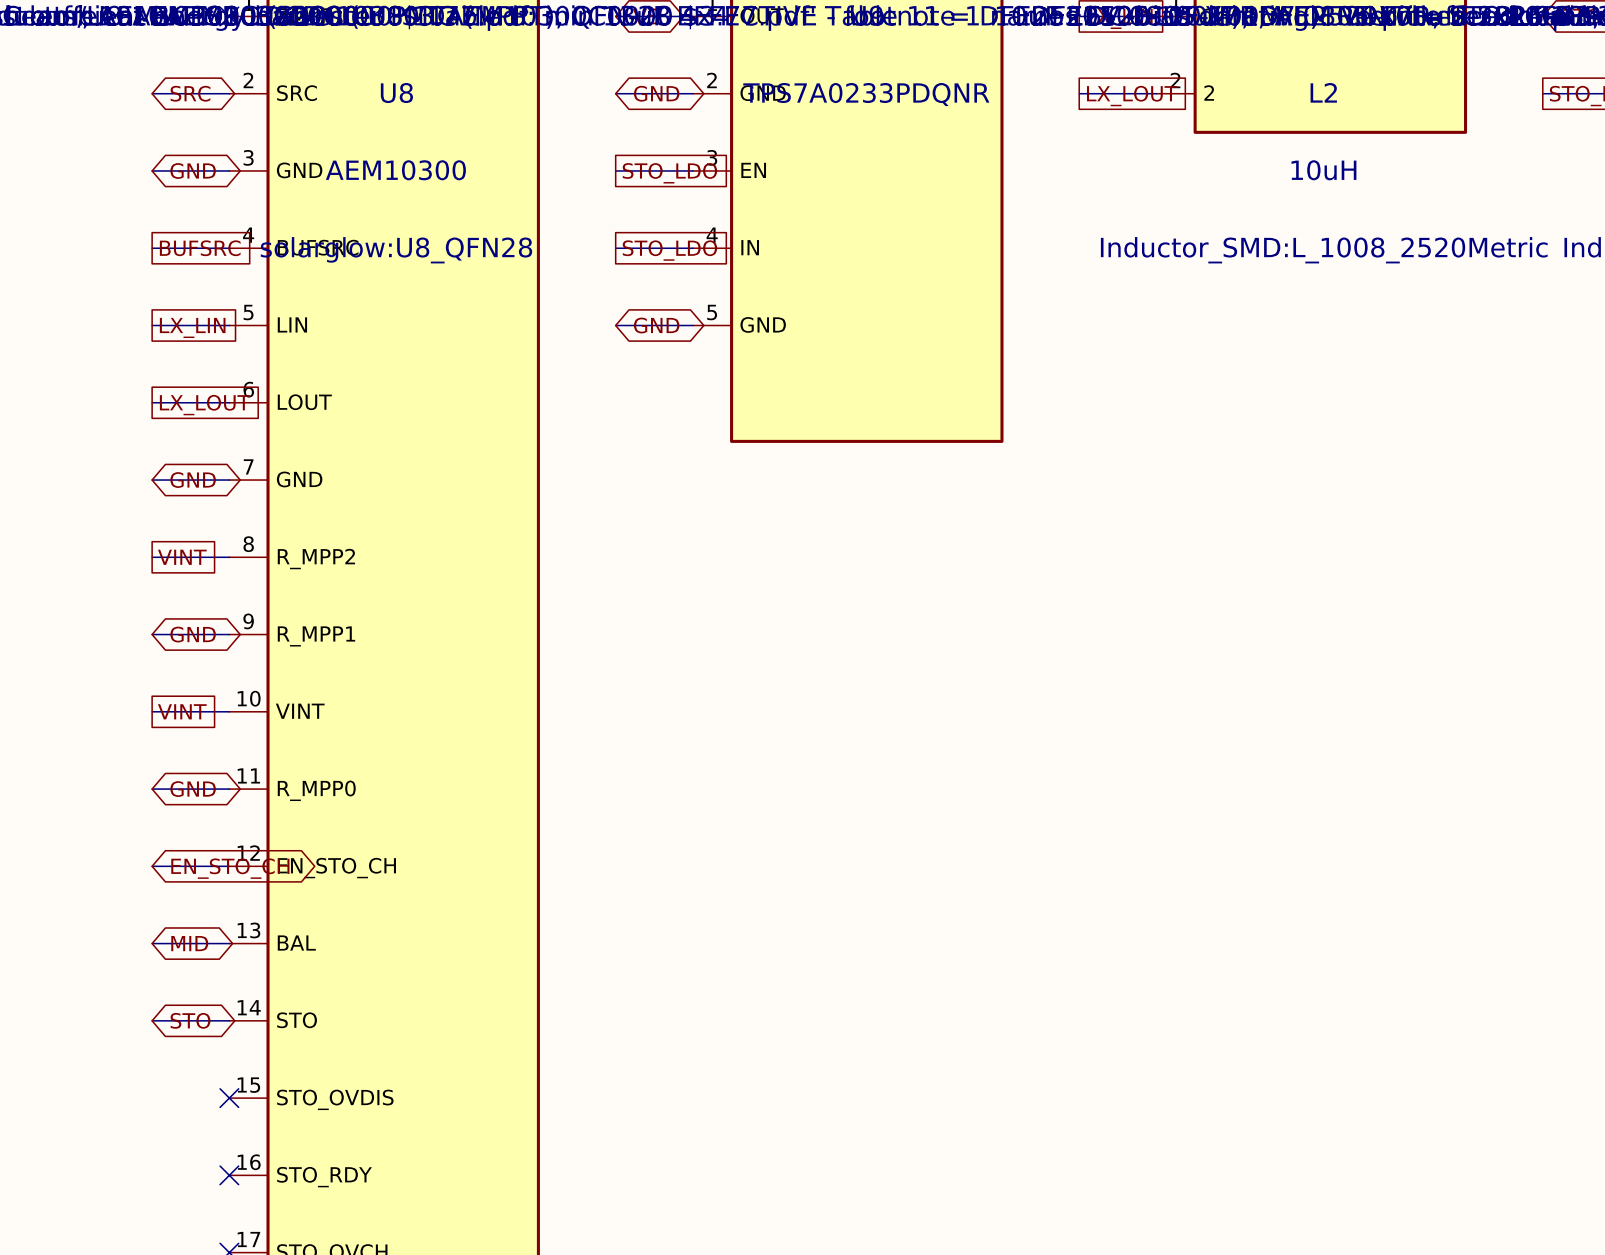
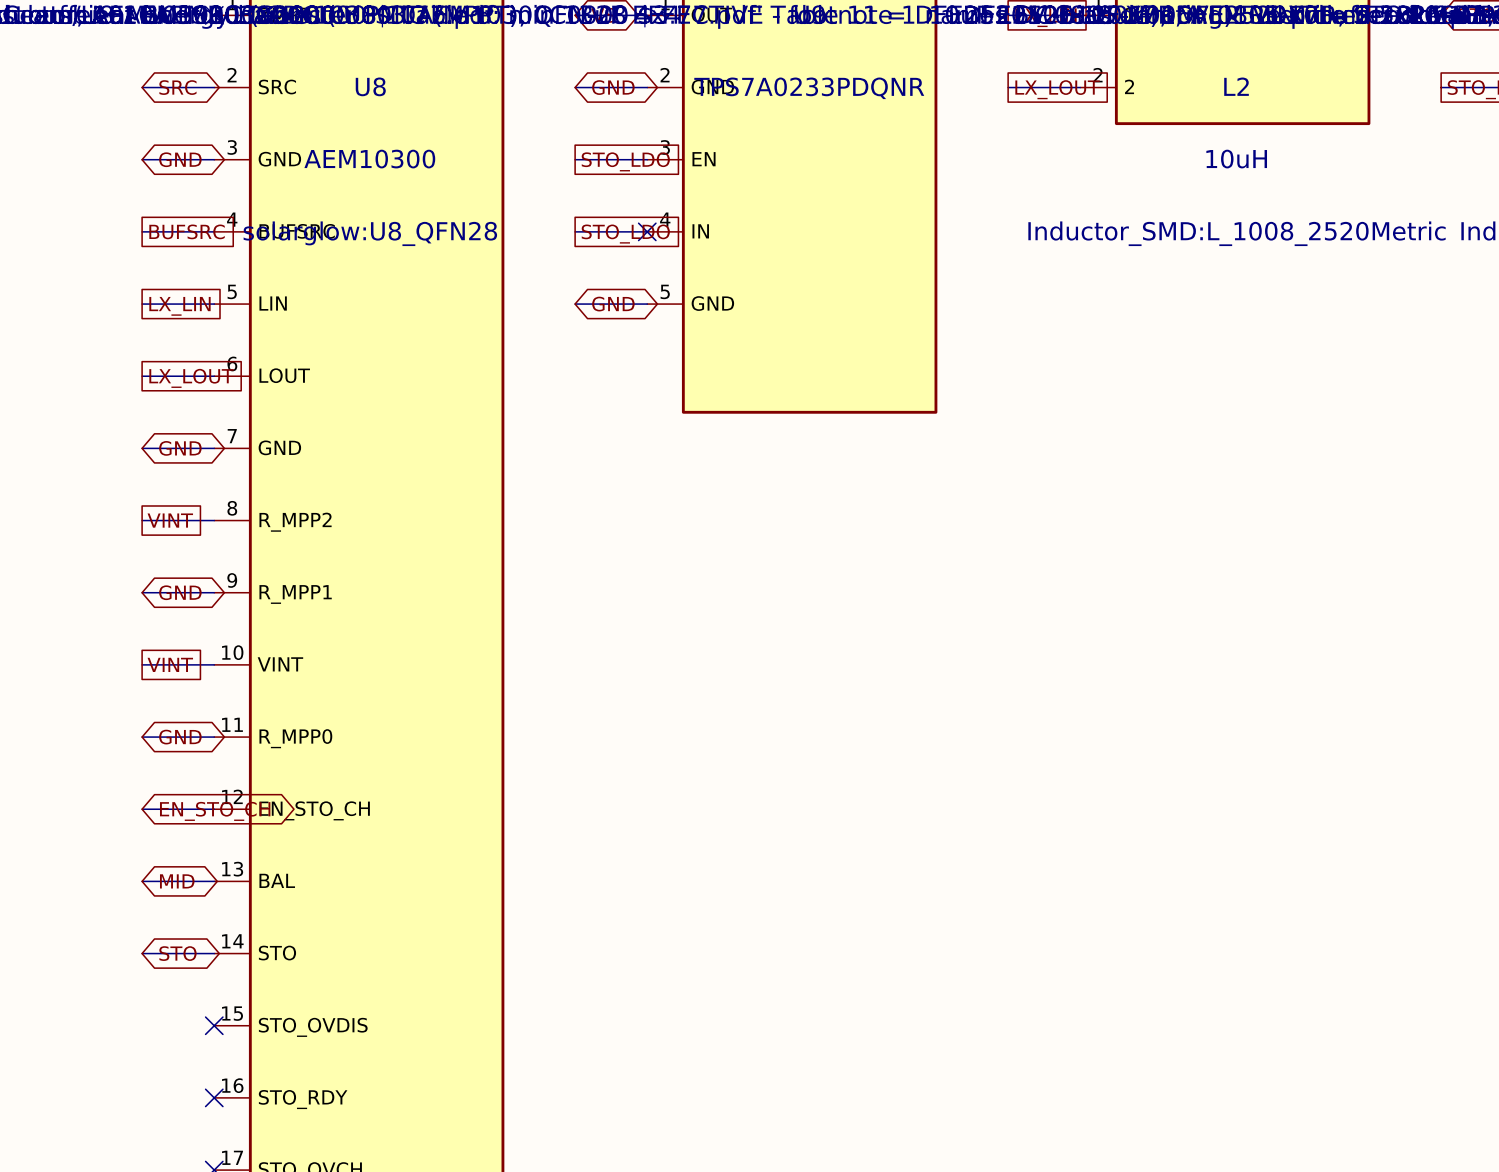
no-connect mark: none -> (647, 231)

